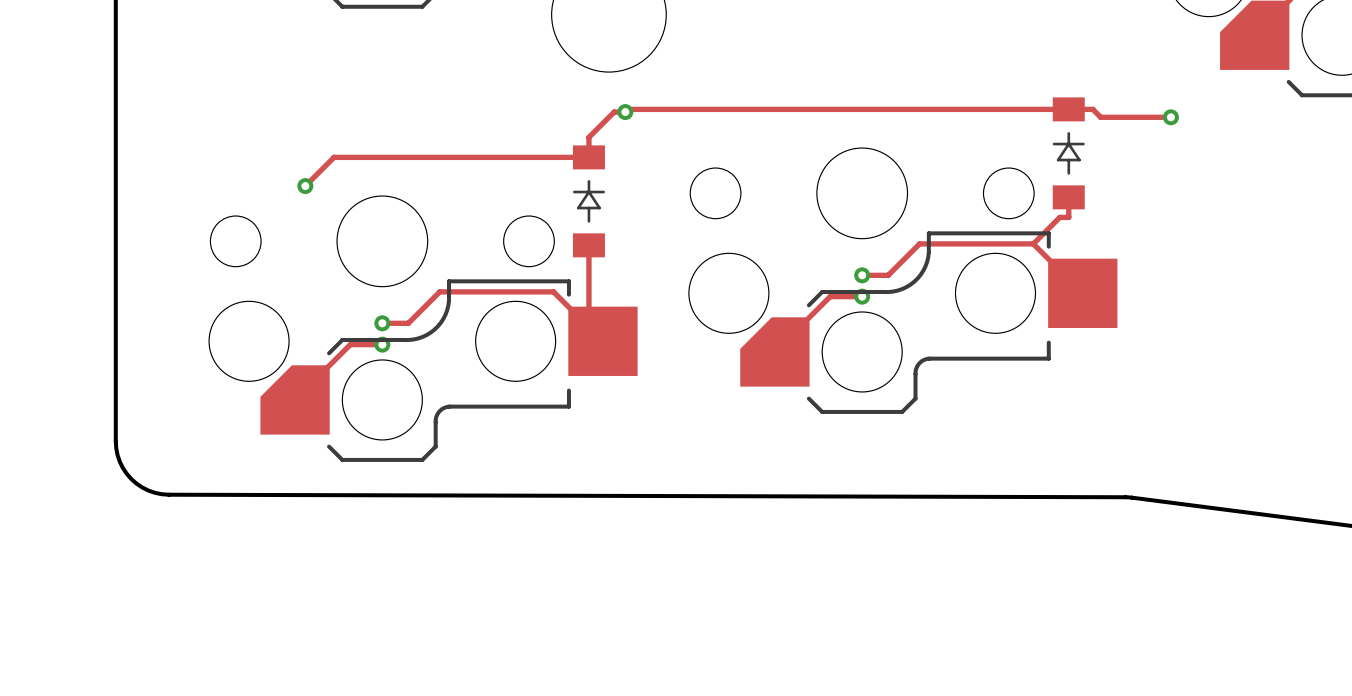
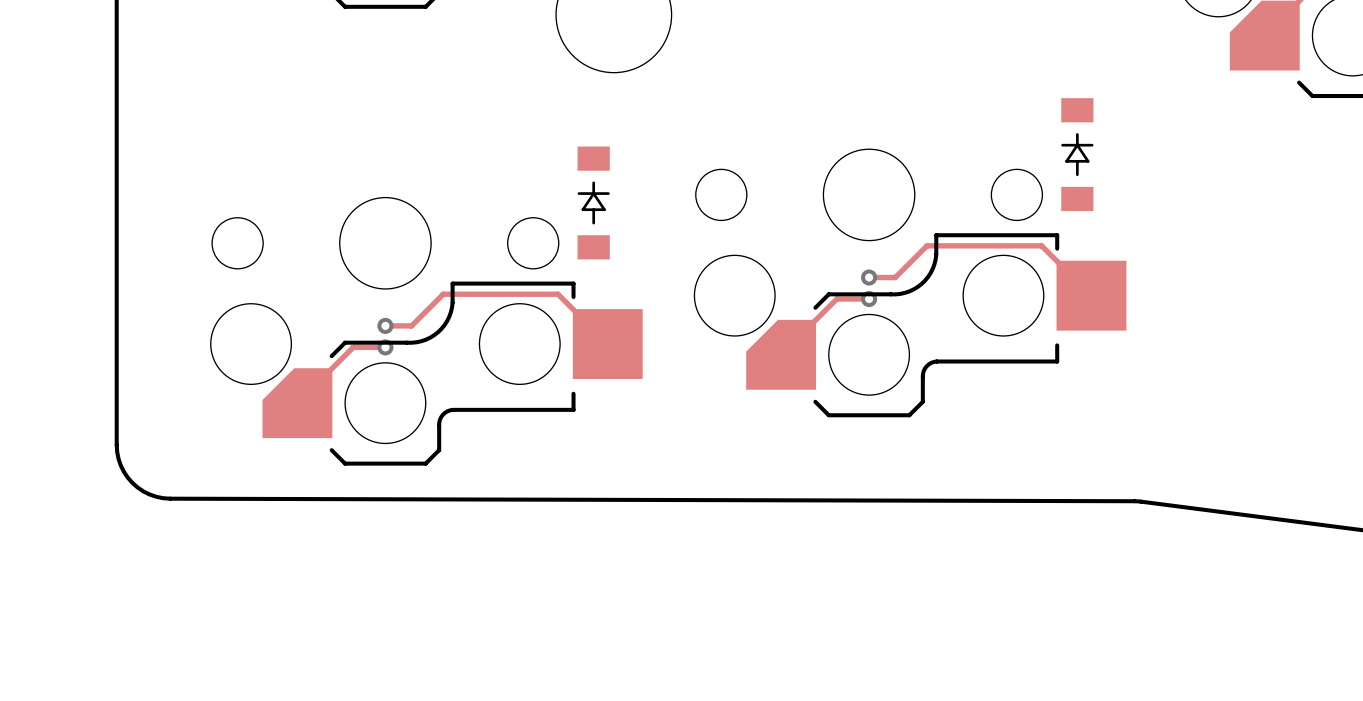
via: (625, 112) -> none
track: (1170, 117) (1100, 117) (1092, 109) (628, 109) (625, 112) (614, 112) (588, 137) (588, 157) (334, 157) (305, 186) -> none
via: (1170, 117) -> none
via: (305, 186) -> none
track: (1068, 197) (1068, 217) (1059, 217) (1033, 243) -> none
track: (588, 245) (588, 315) (583, 321) -> none

